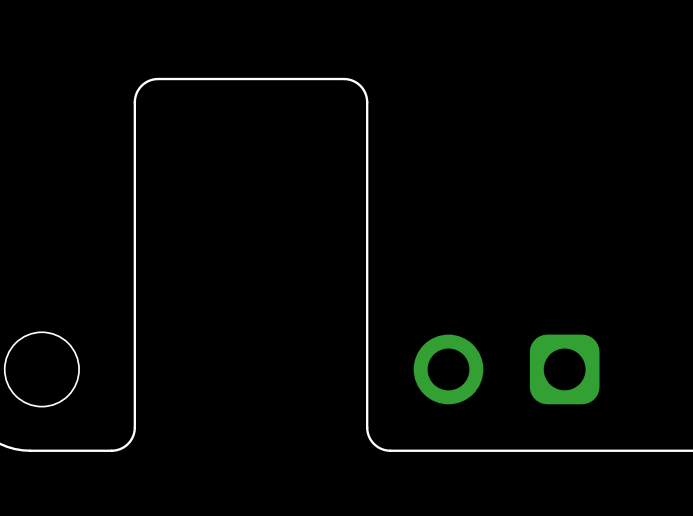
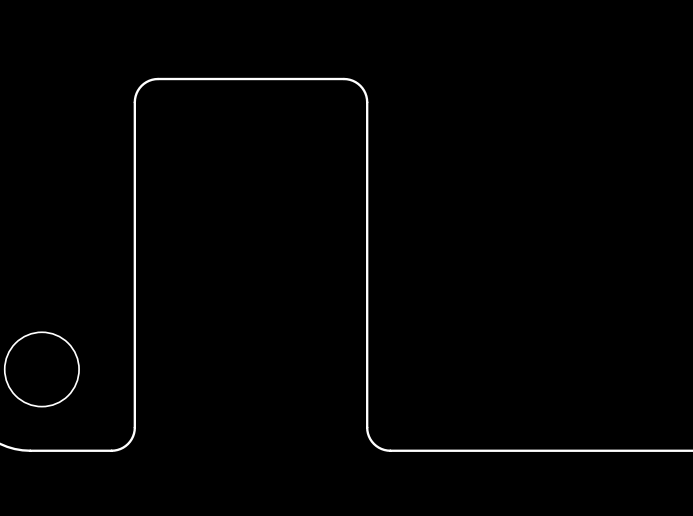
part: (506, 369) -> none

